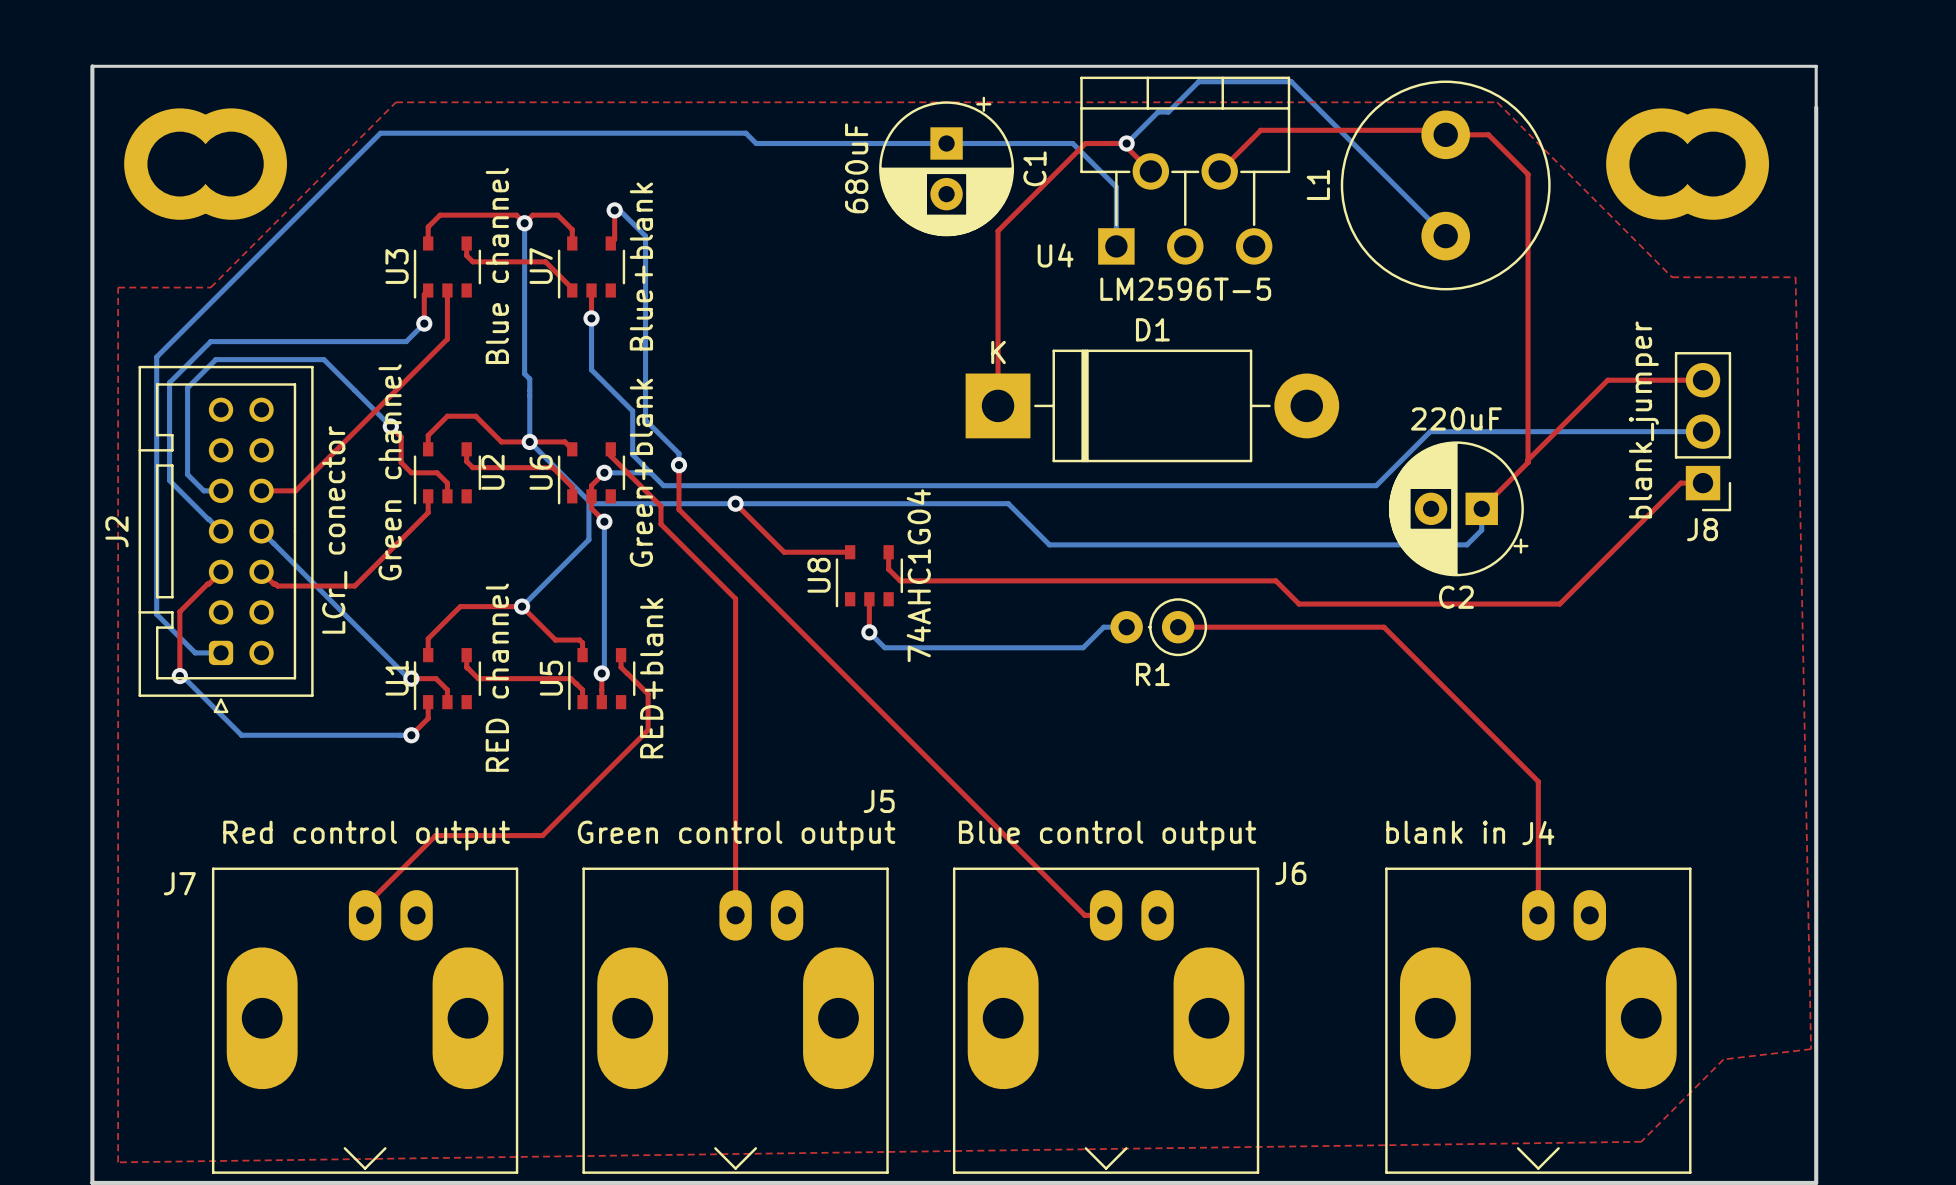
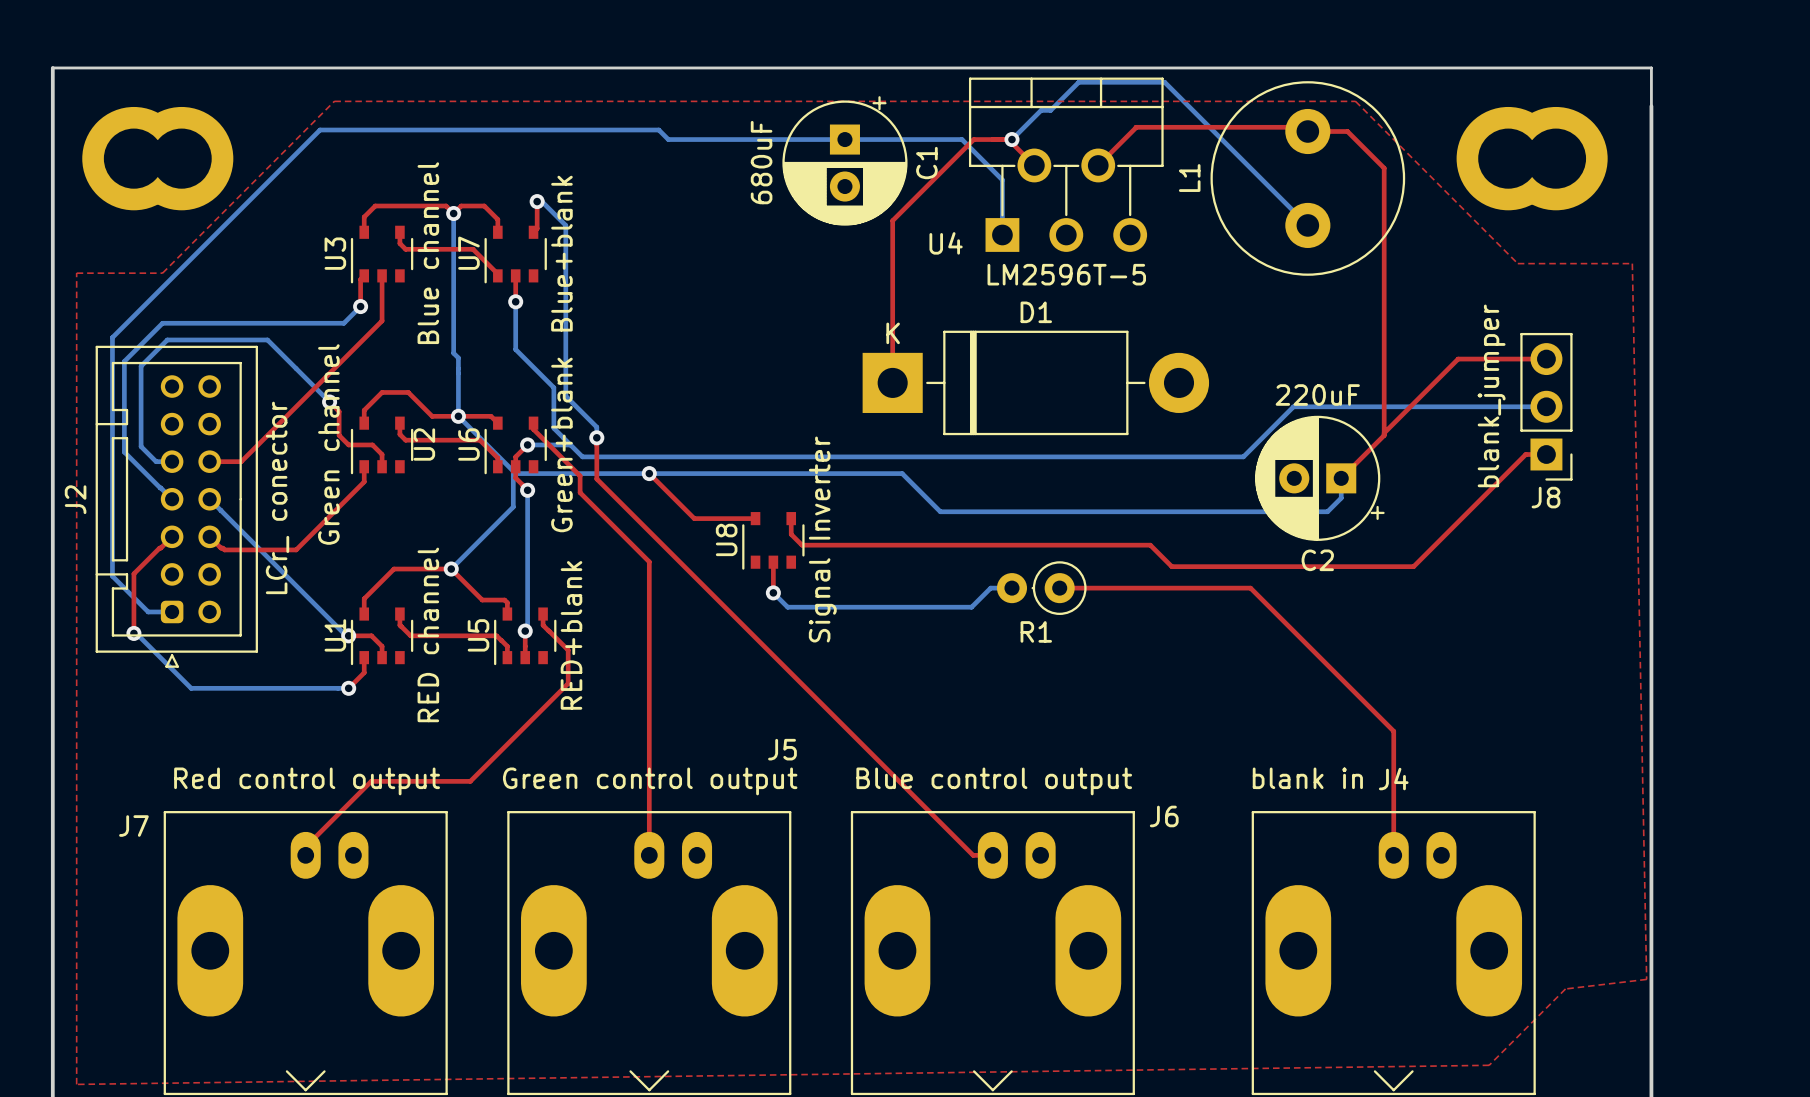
U8 value: 74AHC1G04 (918, 575) -> Signal Inverter (822, 539)

